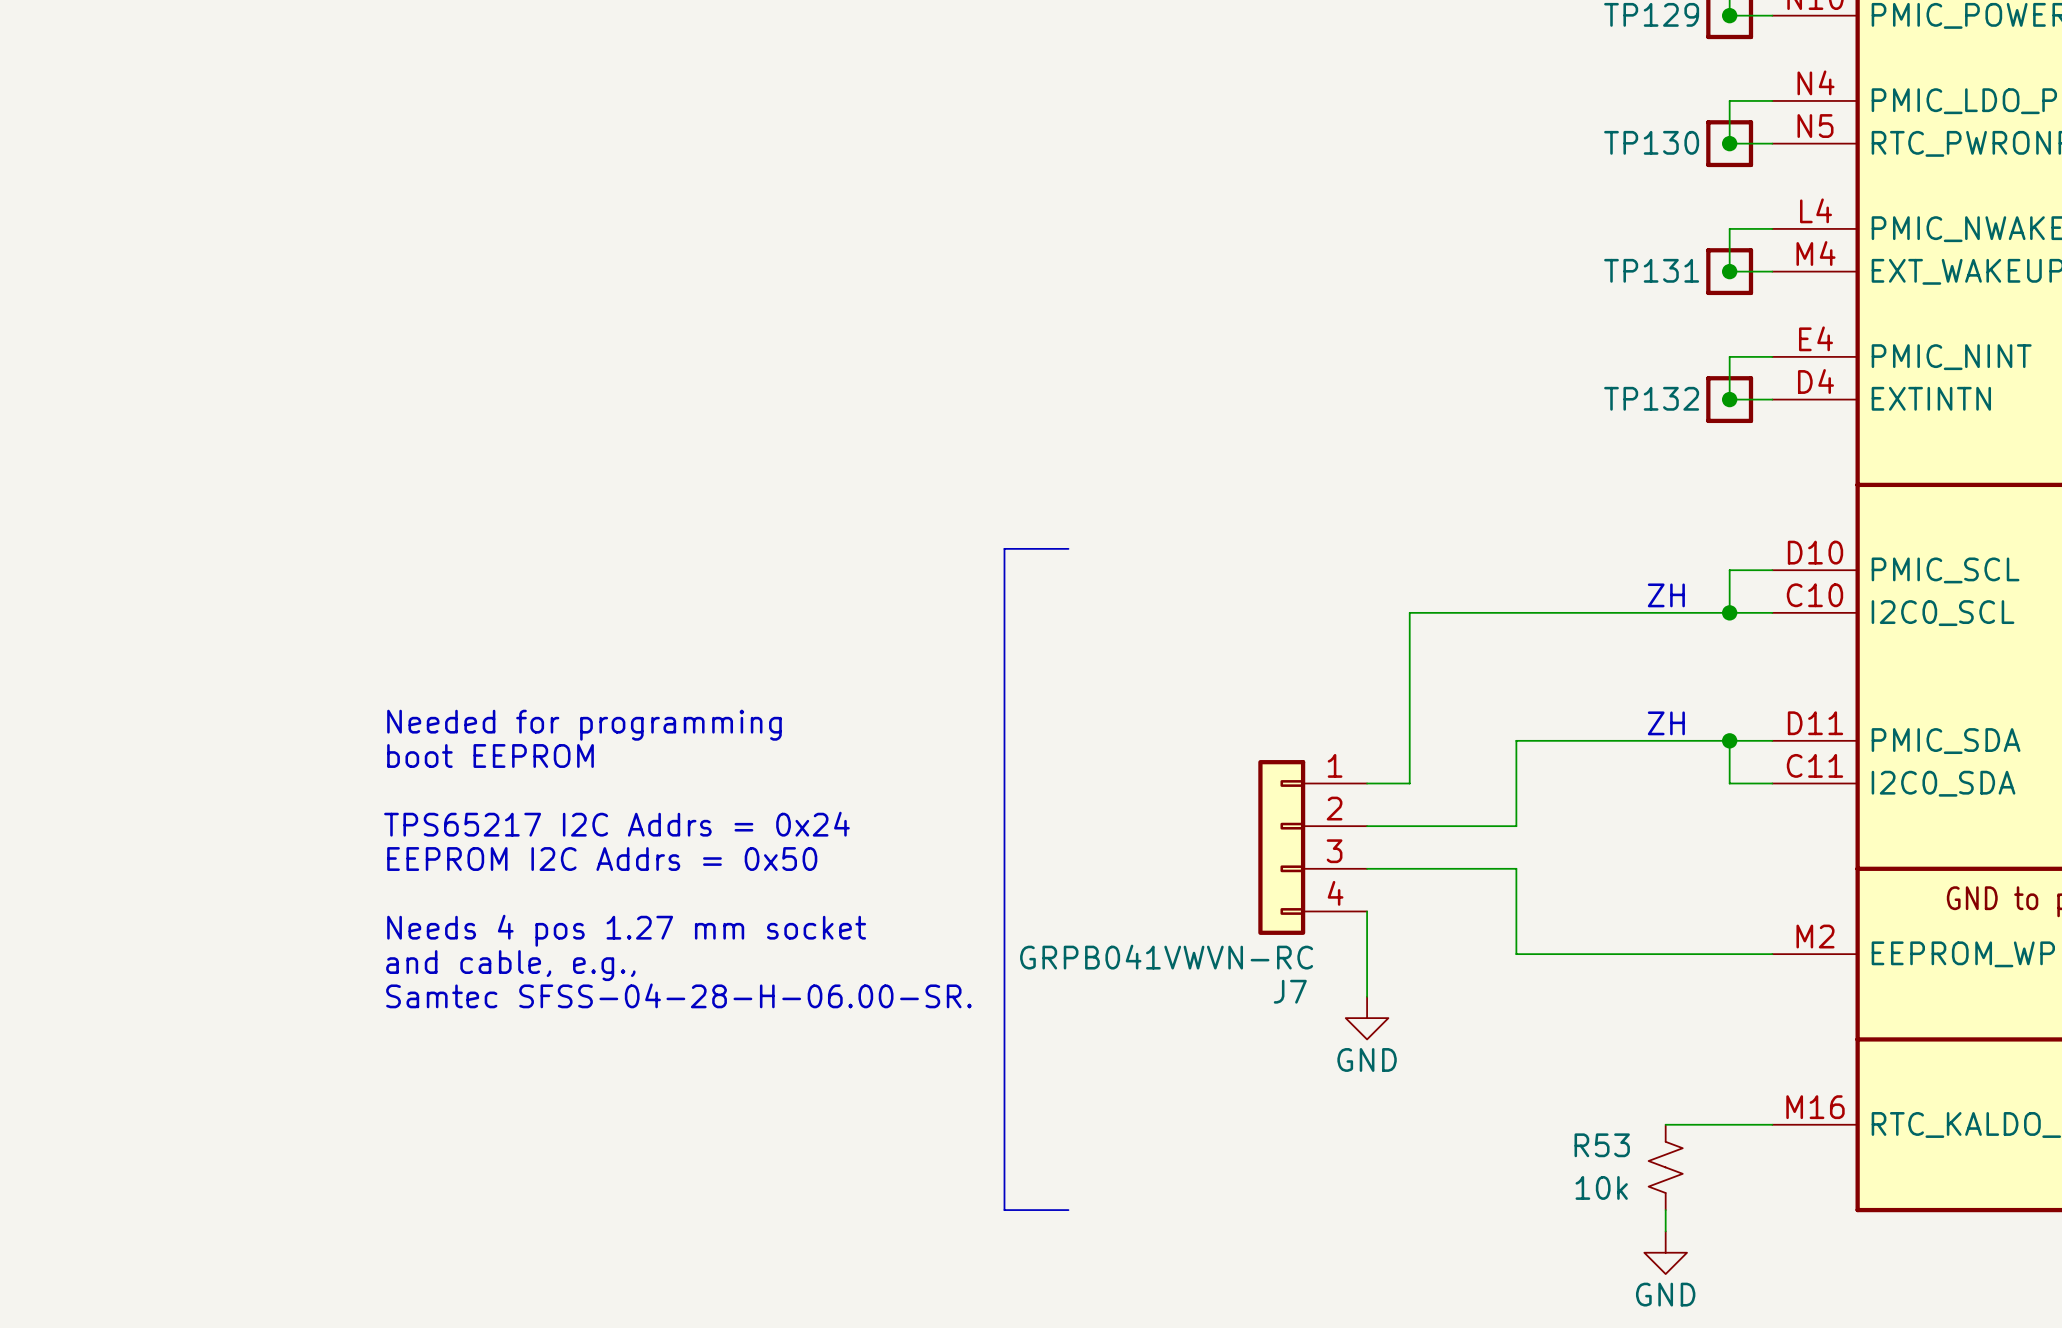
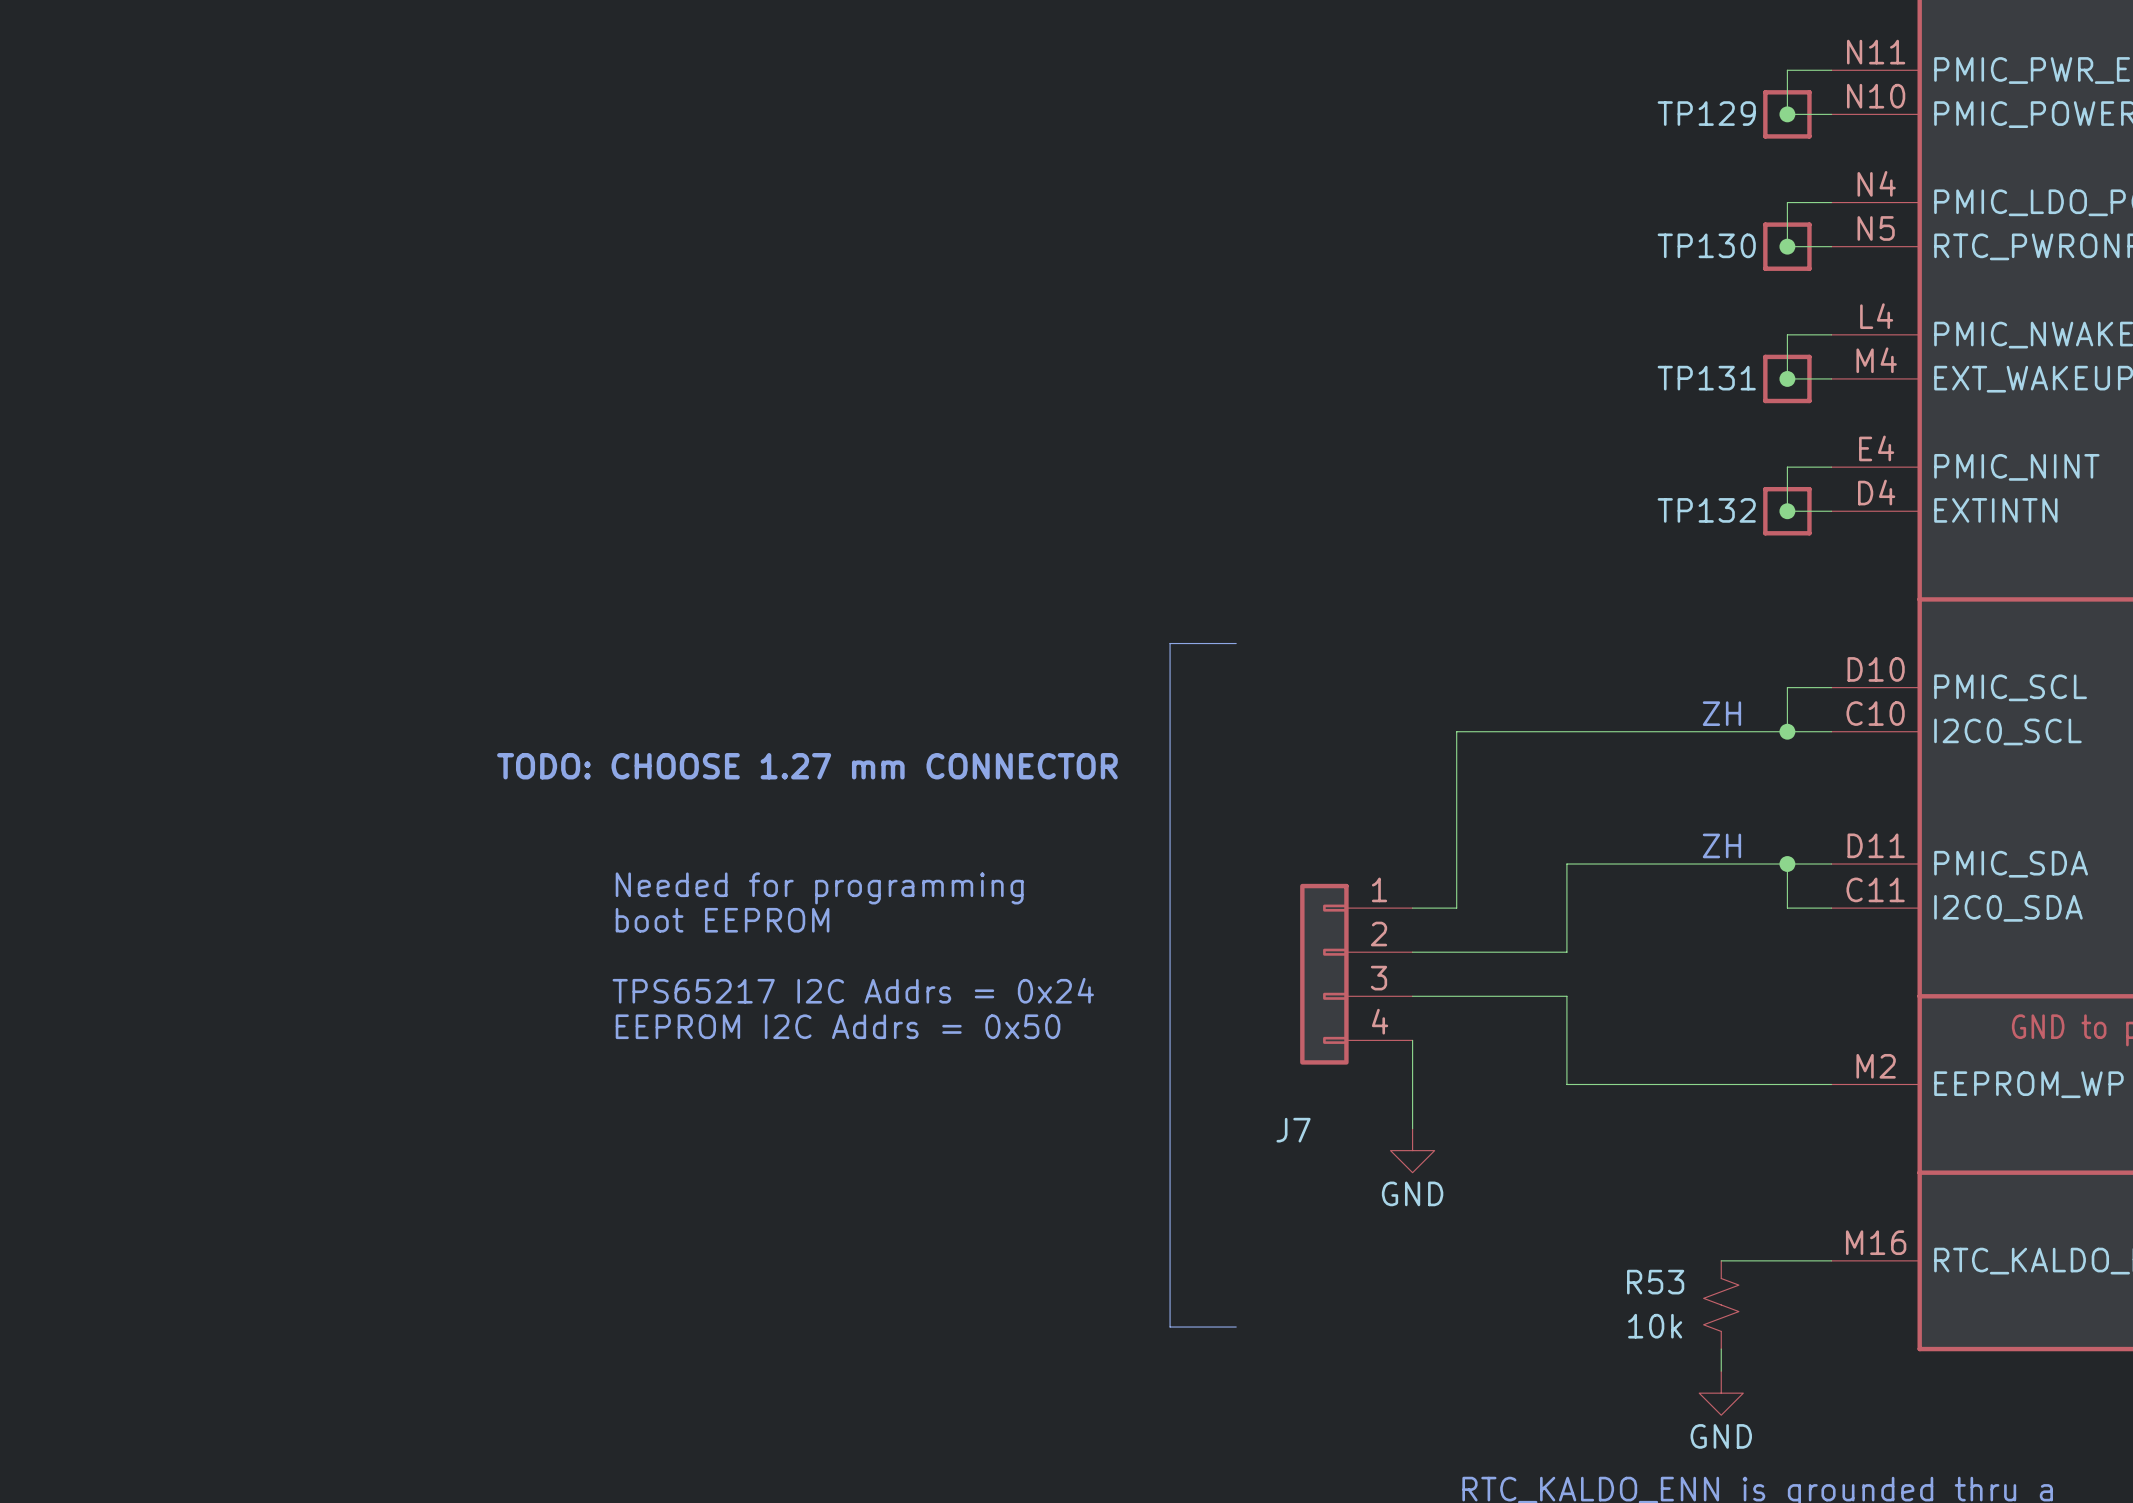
line: (1068, 548) (1004, 548) (1004, 1210) (1068, 1210) -> (1236, 643) (1170, 643) (1170, 1327) (1236, 1327)
text: none -> TODO: CHOOSE 1.27 mm CONNECTOR (807, 766)
text position: Needed for programming (584, 725) -> Needed for programming (819, 888)
text position: boot EEPROM (490, 756) -> boot EEPROM (722, 920)
text position: TPS65217 I2C Addrs = 0x24 (616, 824) -> TPS65217 I2C Addrs = 0x24 (853, 990)
text position: EEPROM I2C Addrs = 0x50 (602, 859) -> EEPROM I2C Addrs = 0x50 (838, 1026)
text: Needs 4 pos 1.27 mm socket (626, 930) -> none
J7 value: GRPB041VWVN-RC (1166, 957) -> none
text: and cable, e.g., (510, 965) -> none
J7 name position: J7 (1290, 991) -> J7 (1293, 1130)
text: Samtec SFSS-04-28-H-06.00-SR. (678, 995) -> none

